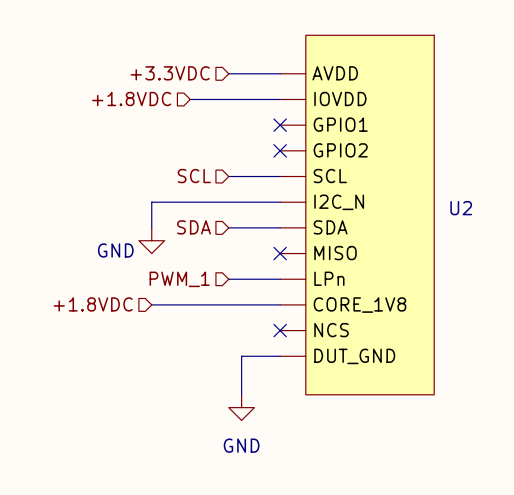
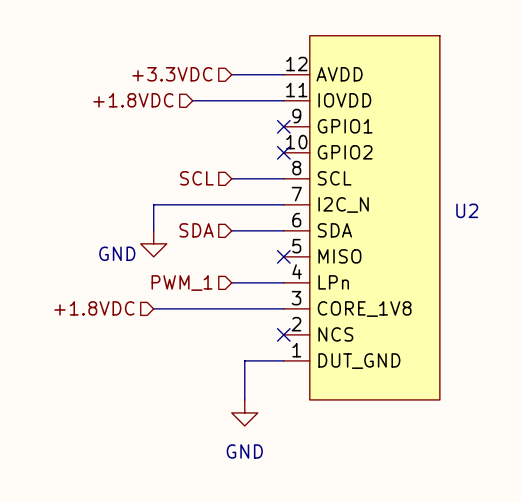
U2 symbol: [280, 35, 435, 395] -> [283, 35, 440, 400]

